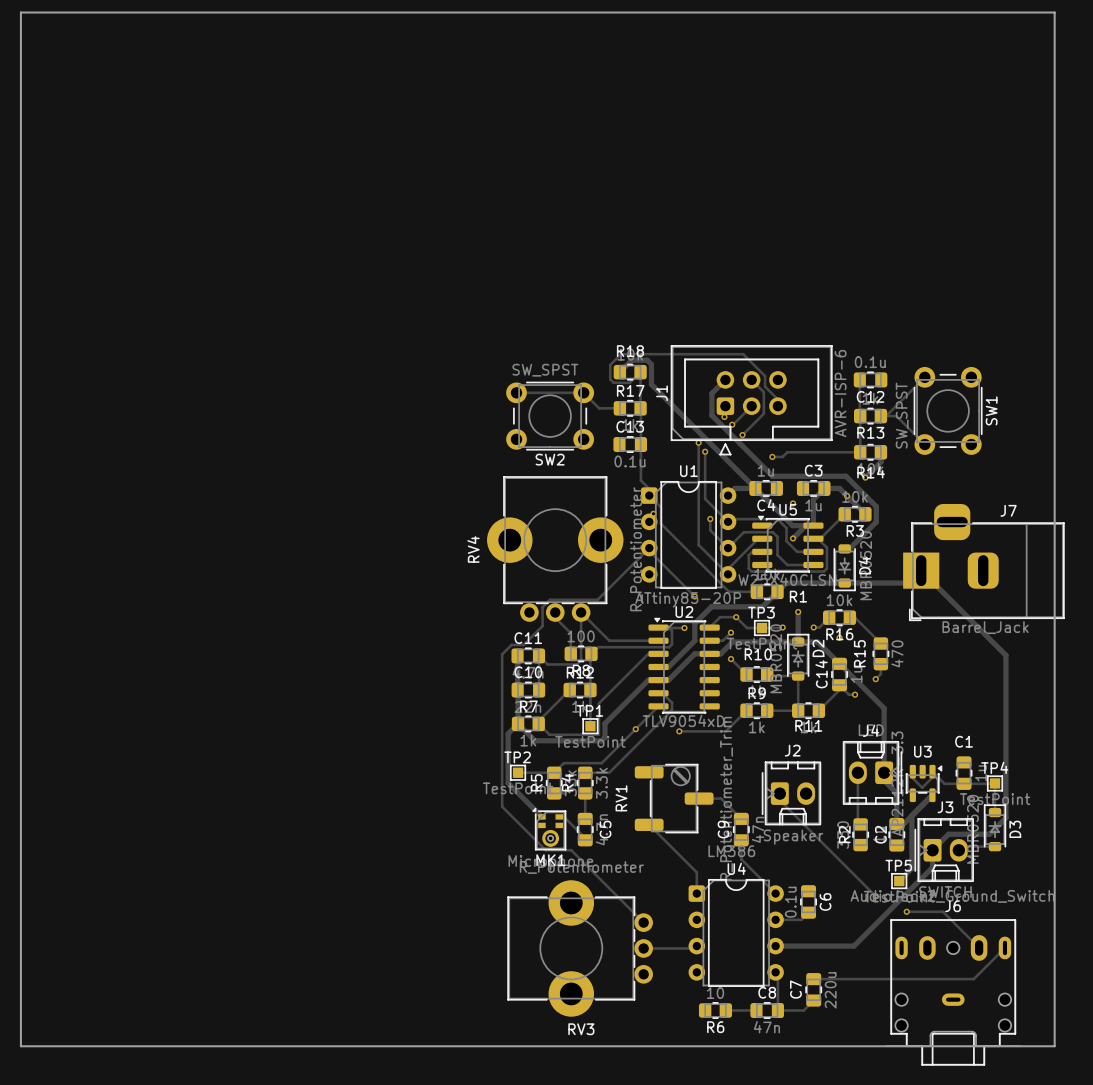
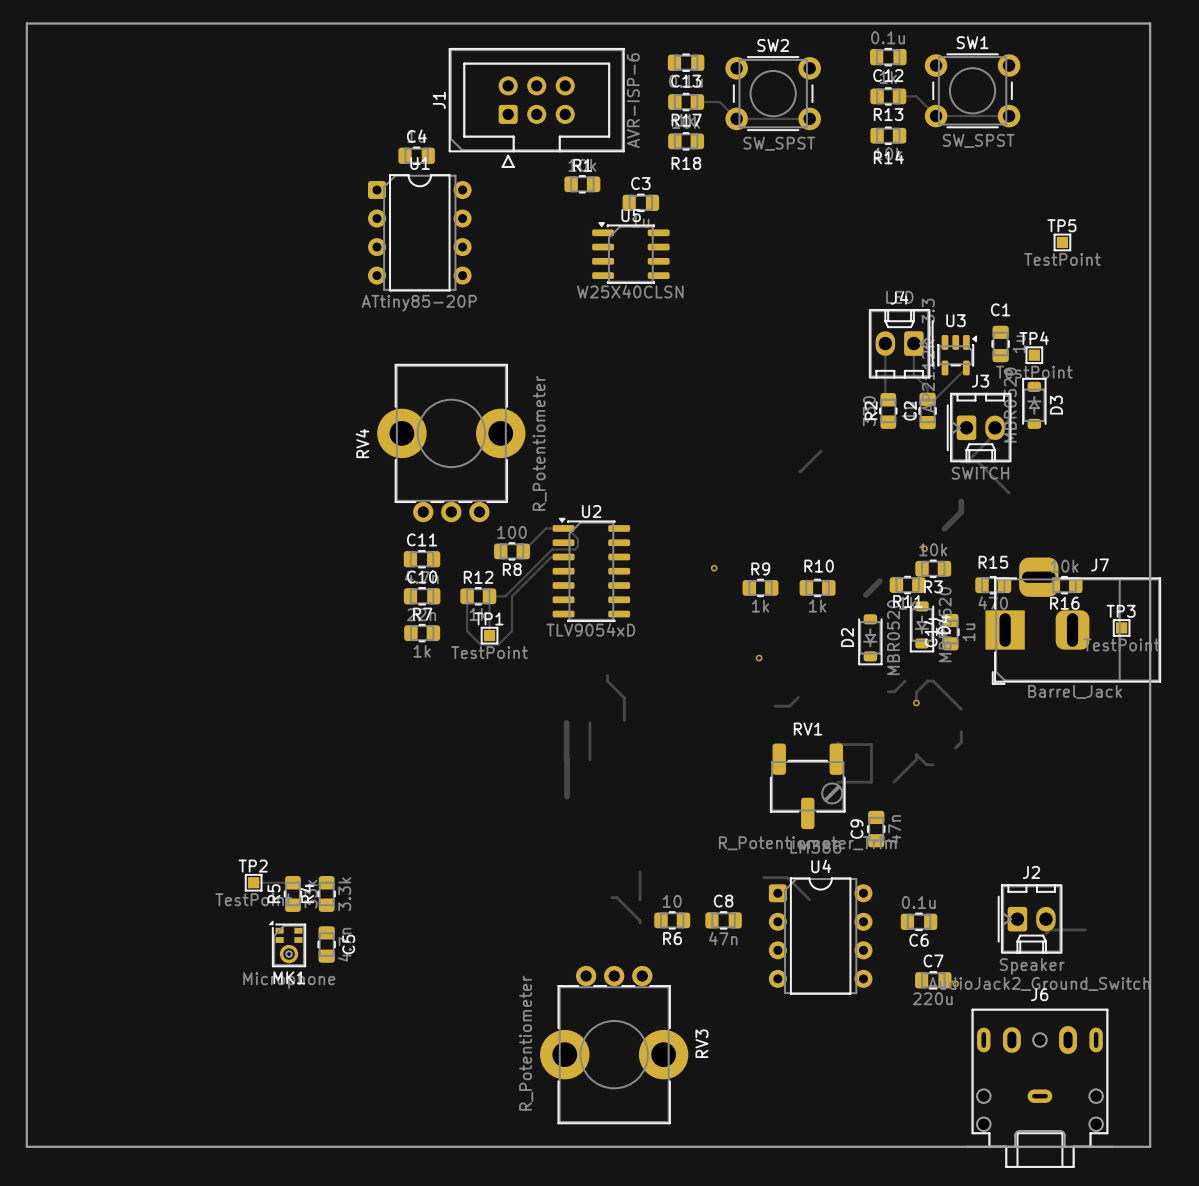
track: none -> (899, 96) (916, 96) (936, 116) (1009, 116)
track: none -> (697, 102) (719, 102) (736, 118) (809, 118)
track: none -> (885, 343) (885, 396) (888, 399)
track: none -> (913, 343) (913, 374) (927, 388) (927, 399) (935, 399) (966, 367)
R18 name position: R18 (630, 351) -> R18 (686, 163)
track: (619, 372) (631, 360) (647, 360) (651, 364) (651, 384) (792, 525) (813, 525) (813, 499) (824, 488) (839, 488) (865, 514) -> none
R18 position: (630, 372) -> (686, 141)
track: (725, 379) (711, 393) (711, 415) (772, 476) (846, 476) (876, 506) (876, 522) (849, 548) (844, 548) -> none
track: (751, 379) (763, 392) (763, 413) (742, 435) -> none
track: (859, 379) (860, 452) (787, 452) (782, 456) (772, 456) -> none
C12 position: (870, 379) -> (888, 57)
R17 name position: R17 (630, 390) -> R17 (686, 120)
track: (516, 392) (583, 392) (599, 408) (619, 408) -> none
J1 position: (751, 400) -> (536, 107)
track: (777, 406) (777, 399) (765, 386) (765, 376) (743, 354) (621, 354) (610, 364) (610, 379) (613, 382) (629, 382) (640, 372) (640, 480) (649, 488) (649, 495) (660, 507) (660, 523) (729, 591) (756, 591) -> none
R17 position: (630, 408) -> (686, 102)
SW1 rotation: 0° (948, 410) -> 90° counterclockwise (972, 90)
SW1 position: (948, 410) -> (972, 90)
SW2 rotation: 0° (550, 416) -> 180° (773, 93)
SW2 position: (550, 416) -> (773, 93)
via: (724, 416) -> none
R13 position: (870, 416) -> (888, 96)
via: (732, 424) -> none
C13 name position: C13 (630, 426) -> C13 (686, 81)
via: (742, 435) -> none
track: (698, 442) (698, 544) (728, 574) (728, 568) (758, 538) (762, 538) -> none
via: (698, 442) -> none
C13 position: (630, 444) -> (686, 62)
track: (705, 451) (705, 498) (728, 521) (730, 519) (777, 519) (786, 528) (786, 541) (797, 551) (813, 551) -> none
via: (705, 451) -> none
R14 position: (870, 452) -> (888, 135)
via: (772, 456) -> none
via: (865, 477) -> none
track: (755, 488) (735, 488) (728, 495) -> none
C4 position: (766, 488) -> (416, 155)
C3 position: (813, 488) -> (640, 202)
track: none -> (523, 551) (546, 528) (567, 528) (577, 538) (577, 546) (574, 549) (552, 549) (505, 596) (489, 596) (489, 635)
track: none -> (563, 556) (551, 556) (512, 596) (512, 631) (498, 644) (480, 644) (467, 631) (467, 596)
via: (793, 503) -> none
C4 name position: C4 (766, 505) -> C4 (416, 136)
track: (844, 514) (820, 538) (813, 538) -> none
track: (710, 518) (710, 530) (728, 548) (743, 532) (772, 532) (777, 536) (777, 555) (787, 565) (813, 565) -> none
via: (710, 518) -> none
U1 position: (688, 534) -> (419, 232)
via: (793, 538) -> none
track: (817, 538) (826, 547) (826, 568) (824, 571) (751, 571) (748, 568) (748, 555) (752, 551) (762, 551) -> none
U5 position: (787, 544) -> (630, 252)
RV4 position: (555, 549) -> (451, 443)
R1 position: (767, 591) -> (582, 184)
track: (694, 596) (649, 550) (649, 548) (597, 599) (550, 599) (542, 607) (542, 626) (523, 645) (511, 645) (502, 654) (502, 806) (545, 850) (571, 850) (643, 922) -> none
R1 name position: R1 (798, 596) -> R1 (582, 165)
track: (798, 611) (798, 641) -> none
via: (798, 611) -> none
via: (736, 617) -> none
R16 position: (839, 617) -> (1064, 585)
track: (782, 627) (747, 628) (736, 617) (720, 617) (709, 627) -> none
via: (782, 627) -> none
via: (813, 627) -> none
track: (684, 628) (658, 628) (658, 627) (668, 627) (672, 630) (672, 644) (669, 647) (598, 647) (590, 654) (590, 726) -> none
via: (684, 628) -> none
TP3 position: (762, 628) -> (1121, 627)
via: (731, 632) -> none
track: (658, 640) (609, 640) (581, 612) (581, 660) (576, 664) (547, 664) (539, 655) -> none
R8 position: (581, 653) -> (512, 551)
track: (658, 653) (648, 653) (598, 703) (598, 734) (549, 734) (538, 723) (538, 721) (569, 690) -> none
R15 rotation: 0° (880, 653) -> 90° clockwise (993, 585)
R15 position: (880, 653) -> (993, 585)
C11 position: (528, 655) -> (422, 559)
D2 rotation: 0° (798, 657) -> 180° (870, 639)
D2 position: (798, 657) -> (870, 639)
track: (731, 659) (746, 674) -> none
via: (731, 659) -> none
U2 position: (684, 665) -> (591, 569)
track: (658, 666) (668, 666) (694, 640) (694, 623) (711, 606) (762, 606) (786, 583) (904, 583) (917, 570) (921, 570) (1005, 655) (1005, 817) (989, 834) (948, 834) (932, 850) (932, 867) (853, 946) (775, 946) -> none
R10 position: (756, 674) -> (817, 587)
C14 position: (839, 674) -> (950, 632)
via: (875, 679) -> none
C10 position: (528, 690) -> (422, 596)
R12 position: (580, 690) -> (478, 596)
track: (658, 693) (662, 693) (672, 702) (672, 710) (609, 772) (585, 772) (564, 793) (554, 793) -> none
via: (855, 694) -> none
track: (658, 706) (601, 763) (563, 763) (554, 772) (518, 772) -> none
track: (746, 710) (725, 731) (679, 731) -> none
R9 position: (756, 710) -> (760, 587)
R11 position: (808, 710) -> (907, 585)
R7 position: (528, 723) -> (422, 633)
TP1 position: (590, 726) -> (489, 635)
via: (635, 729) -> none
via: (679, 731) -> none
track: (912, 771) (912, 778) (922, 787) (932, 777) (932, 771) (944, 783) (995, 783) (995, 812) -> none
TP2 position: (518, 772) -> (253, 882)
track: (857, 772) (857, 821) (860, 824) -> none
J4 position: (872, 772) -> (901, 343)
C1 position: (964, 773) -> (1000, 343)
R5 position: (554, 783) -> (292, 893)
R4 position: (585, 783) -> (326, 893)
U3 position: (924, 783) -> (957, 355)
TP4 position: (995, 783) -> (1034, 355)
track: (779, 793) (779, 800) (875, 896) -> none
J2 position: (791, 793) -> (1030, 918)
track: (932, 795) (903, 824) (896, 824) (896, 793) (884, 780) (884, 708) (817, 641) (732, 641) (720, 653) (694, 653) (668, 680) (648, 680) (604, 723) (604, 737) (601, 740) (534, 740) (518, 723) (508, 733) (508, 783) (541, 816) -> none
RV1 rotation: 0° (674, 798) -> 90° clockwise (807, 786)
RV1 position: (674, 798) -> (807, 786)
track: none -> (253, 882) (292, 882)
track: (911, 815) (911, 868) (899, 881) -> none
track: (649, 824) (696, 872) (696, 893) -> none
D3 position: (995, 827) -> (1034, 403)
MK1 position: (549, 828) -> (287, 943)
C5 position: (585, 829) -> (326, 944)
C9 position: (741, 829) -> (876, 829)
R2 position: (860, 834) -> (888, 410)
C2 position: (896, 834) -> (927, 410)
track: (741, 840) (741, 859) (775, 893) -> none
J3 position: (944, 850) -> (979, 427)
TP5 position: (899, 881) -> (1062, 242)
C6 rotation: 0° (808, 901) -> 90° clockwise (919, 921)
C6 position: (808, 901) -> (919, 921)
track: (906, 911) (942, 911) (979, 947) -> none
via: (906, 911) -> none
track: (808, 912) (801, 919) (775, 919) -> none
U4 position: (736, 932) -> (820, 936)
track: (696, 946) (694, 948) (643, 948) -> none
track: (1004, 947) (973, 979) (813, 979) -> none
RV3 rotation: 0° (580, 948) -> 90° counterclockwise (614, 1044)
track: (775, 972) (777, 974) (777, 1010) (803, 1010) (813, 1000) -> none
C7 rotation: 0° (813, 989) -> 90° clockwise (933, 980)
C7 position: (813, 989) -> (933, 980)
R6 position: (715, 1010) -> (672, 920)
track: (725, 1010) (756, 1010) -> none
C8 position: (767, 1010) -> (723, 920)

